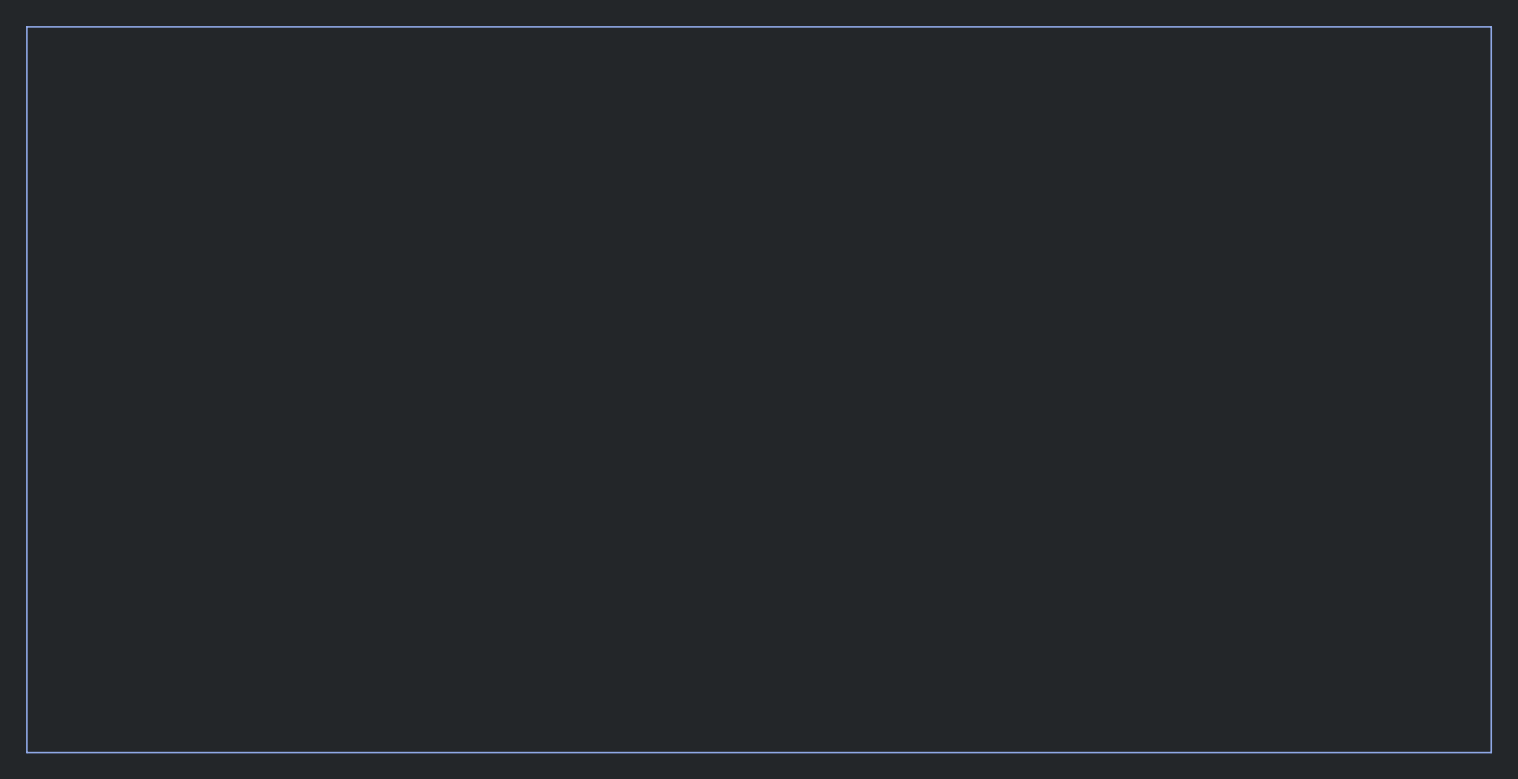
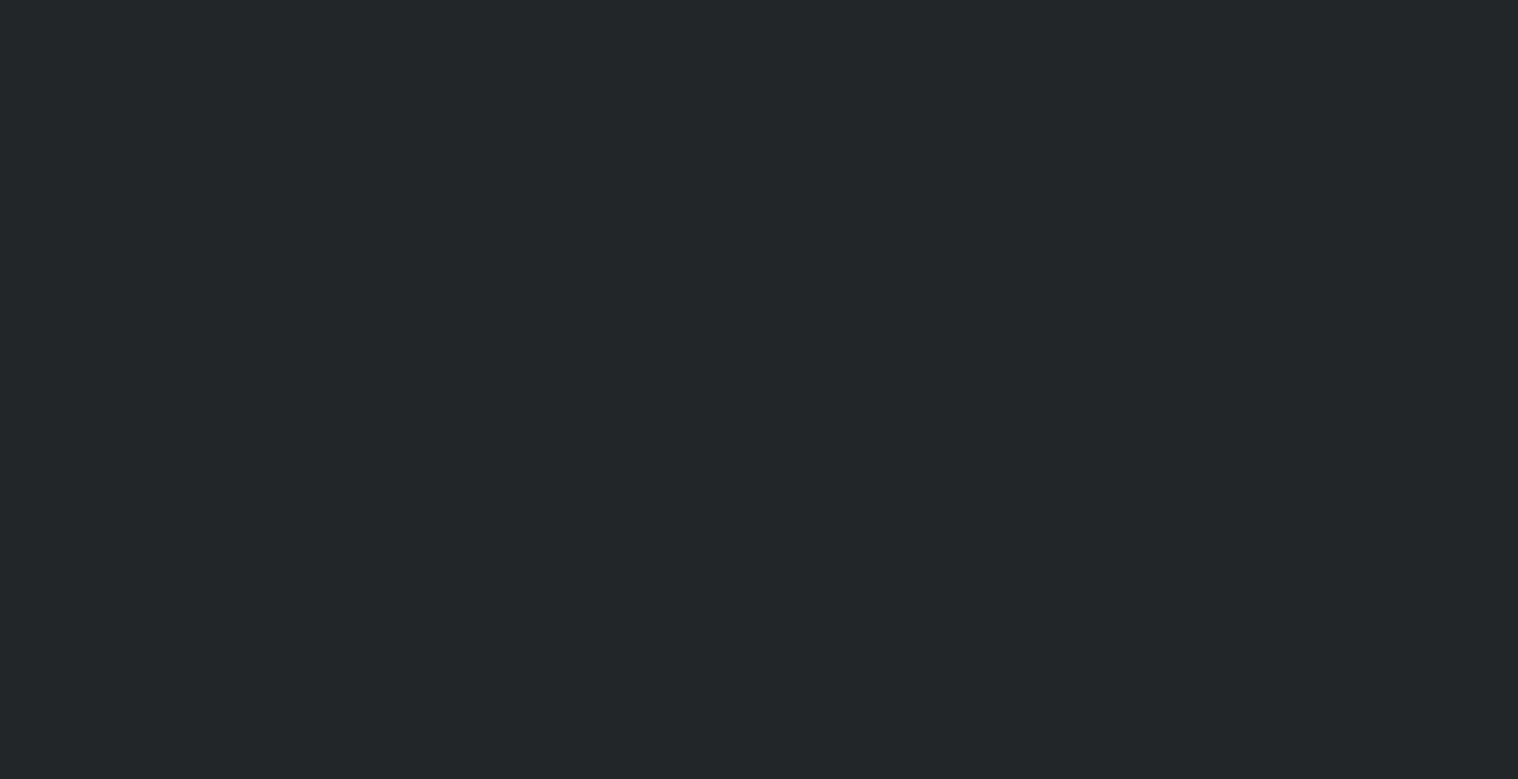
line: (26, 26) (1491, 26) (1491, 752) (26, 752) (26, 26) -> none

